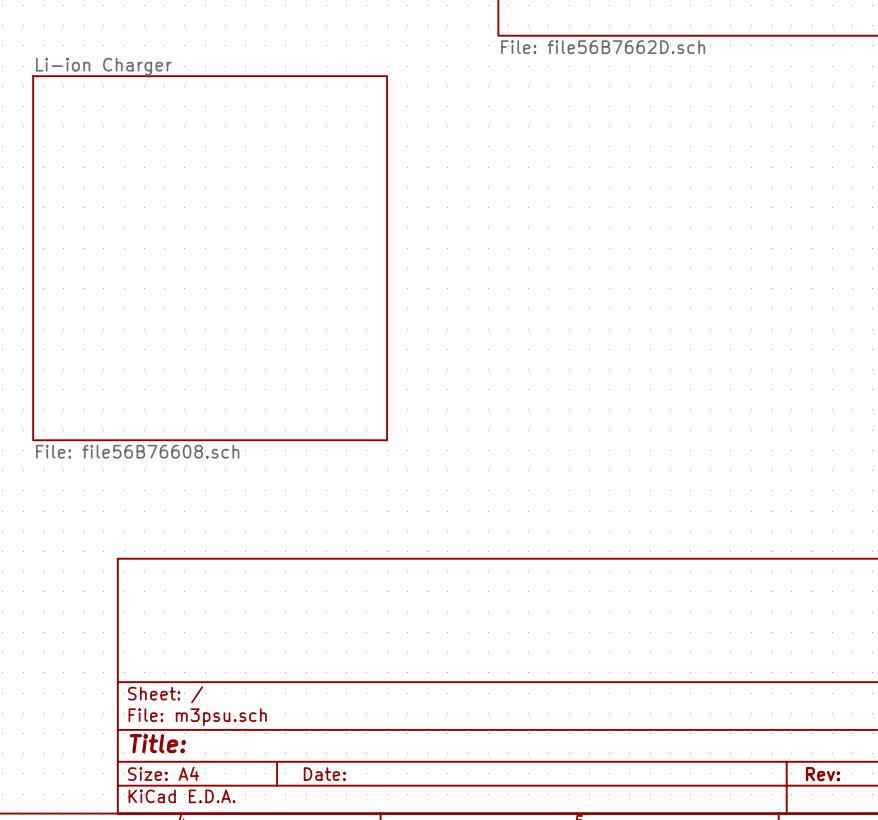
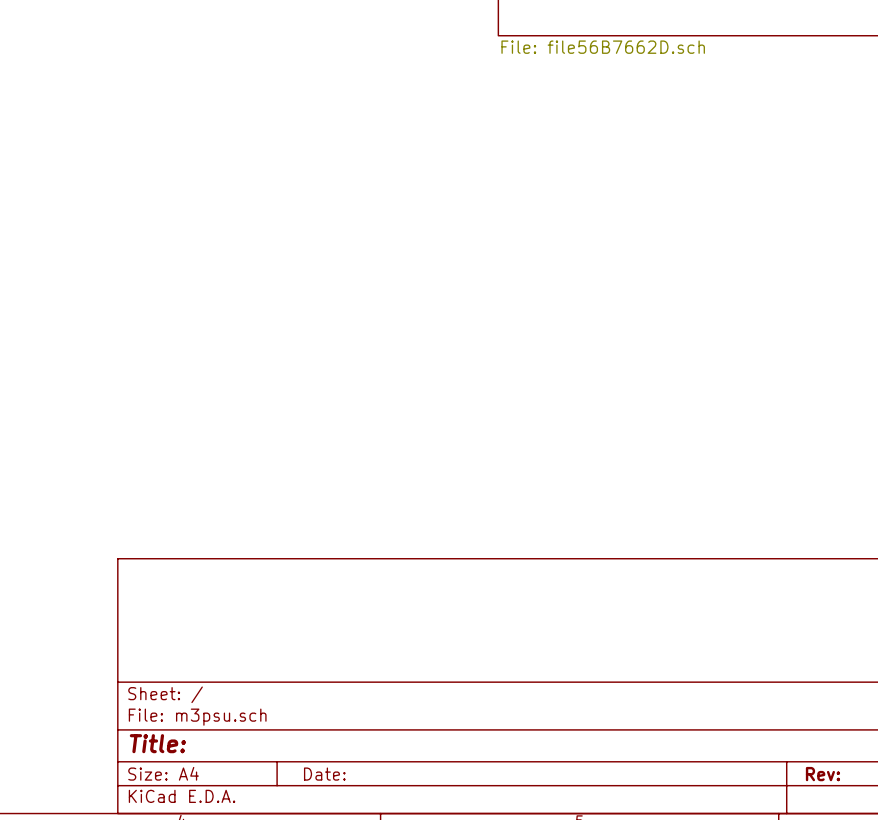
sheet Li-ion Charger: File: file56B76608.sch (210, 258) -> none

